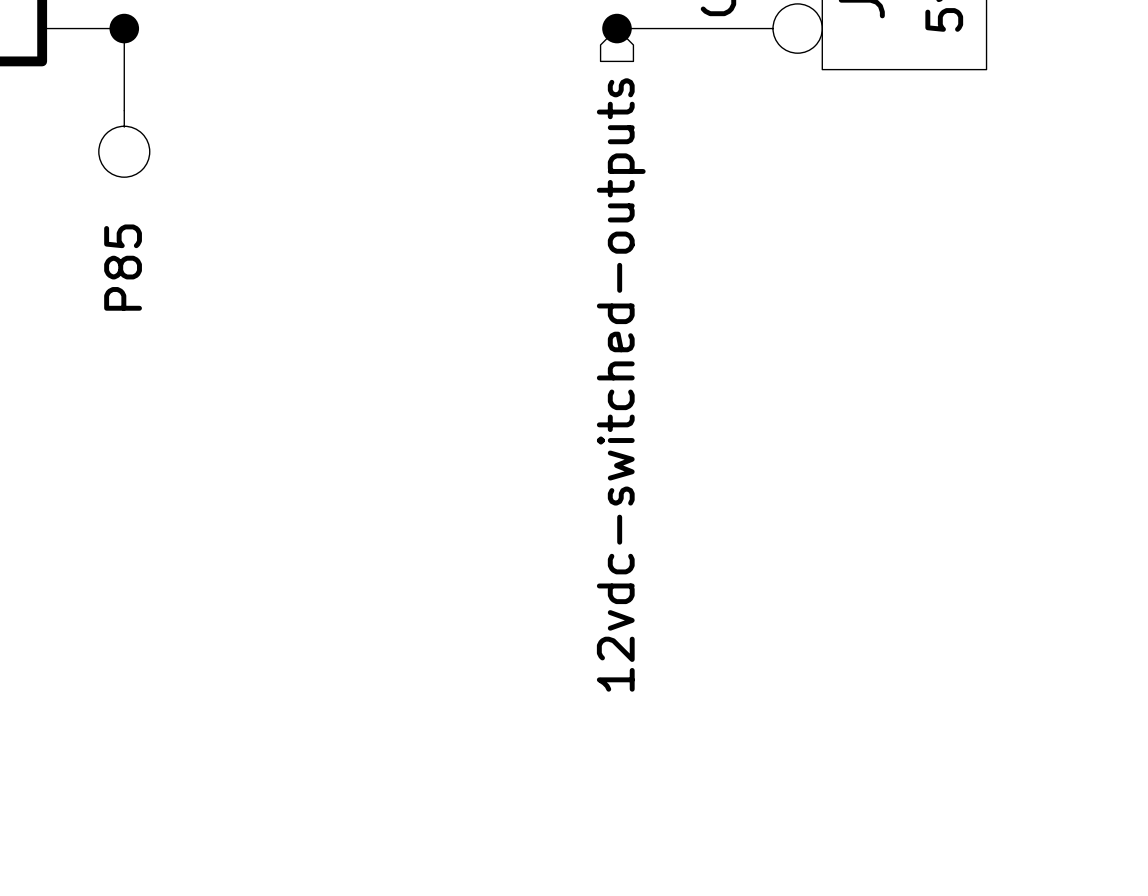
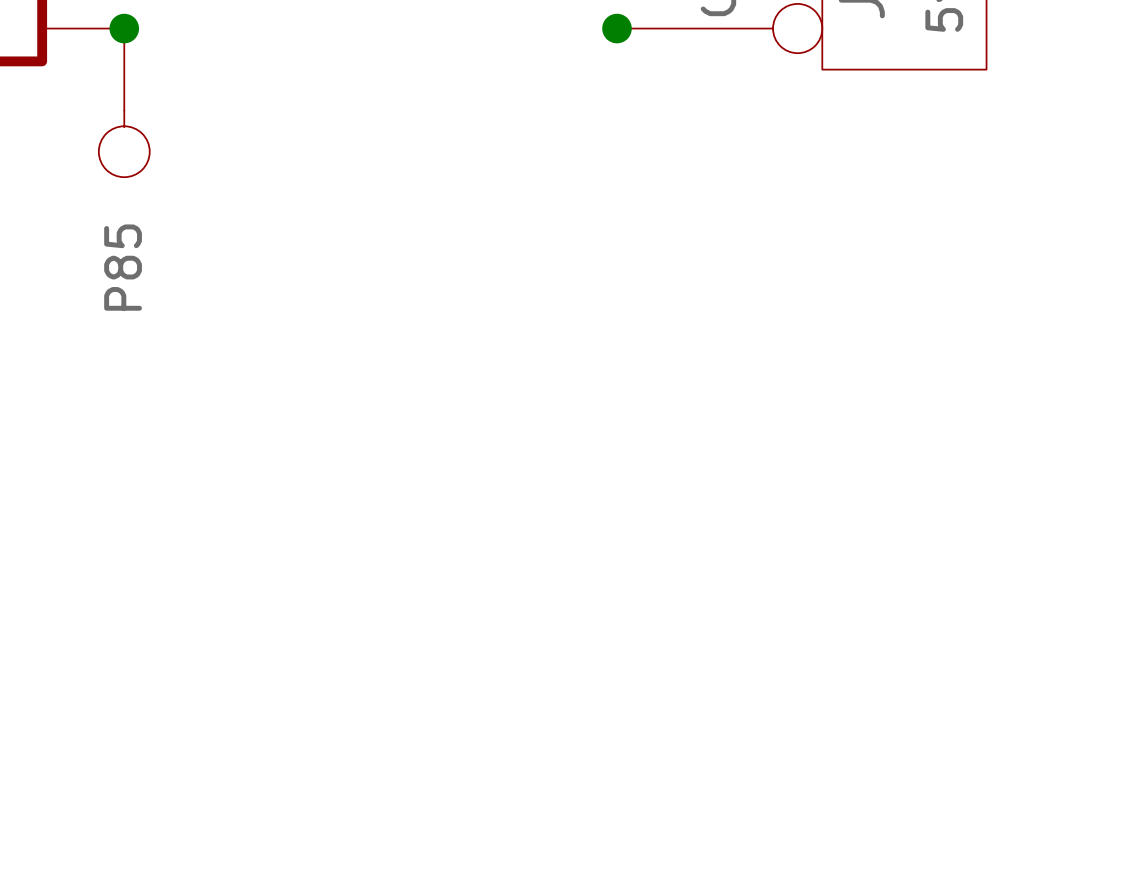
hierarchical label: 12vdc-switched-outputs (621, 384) -> none

